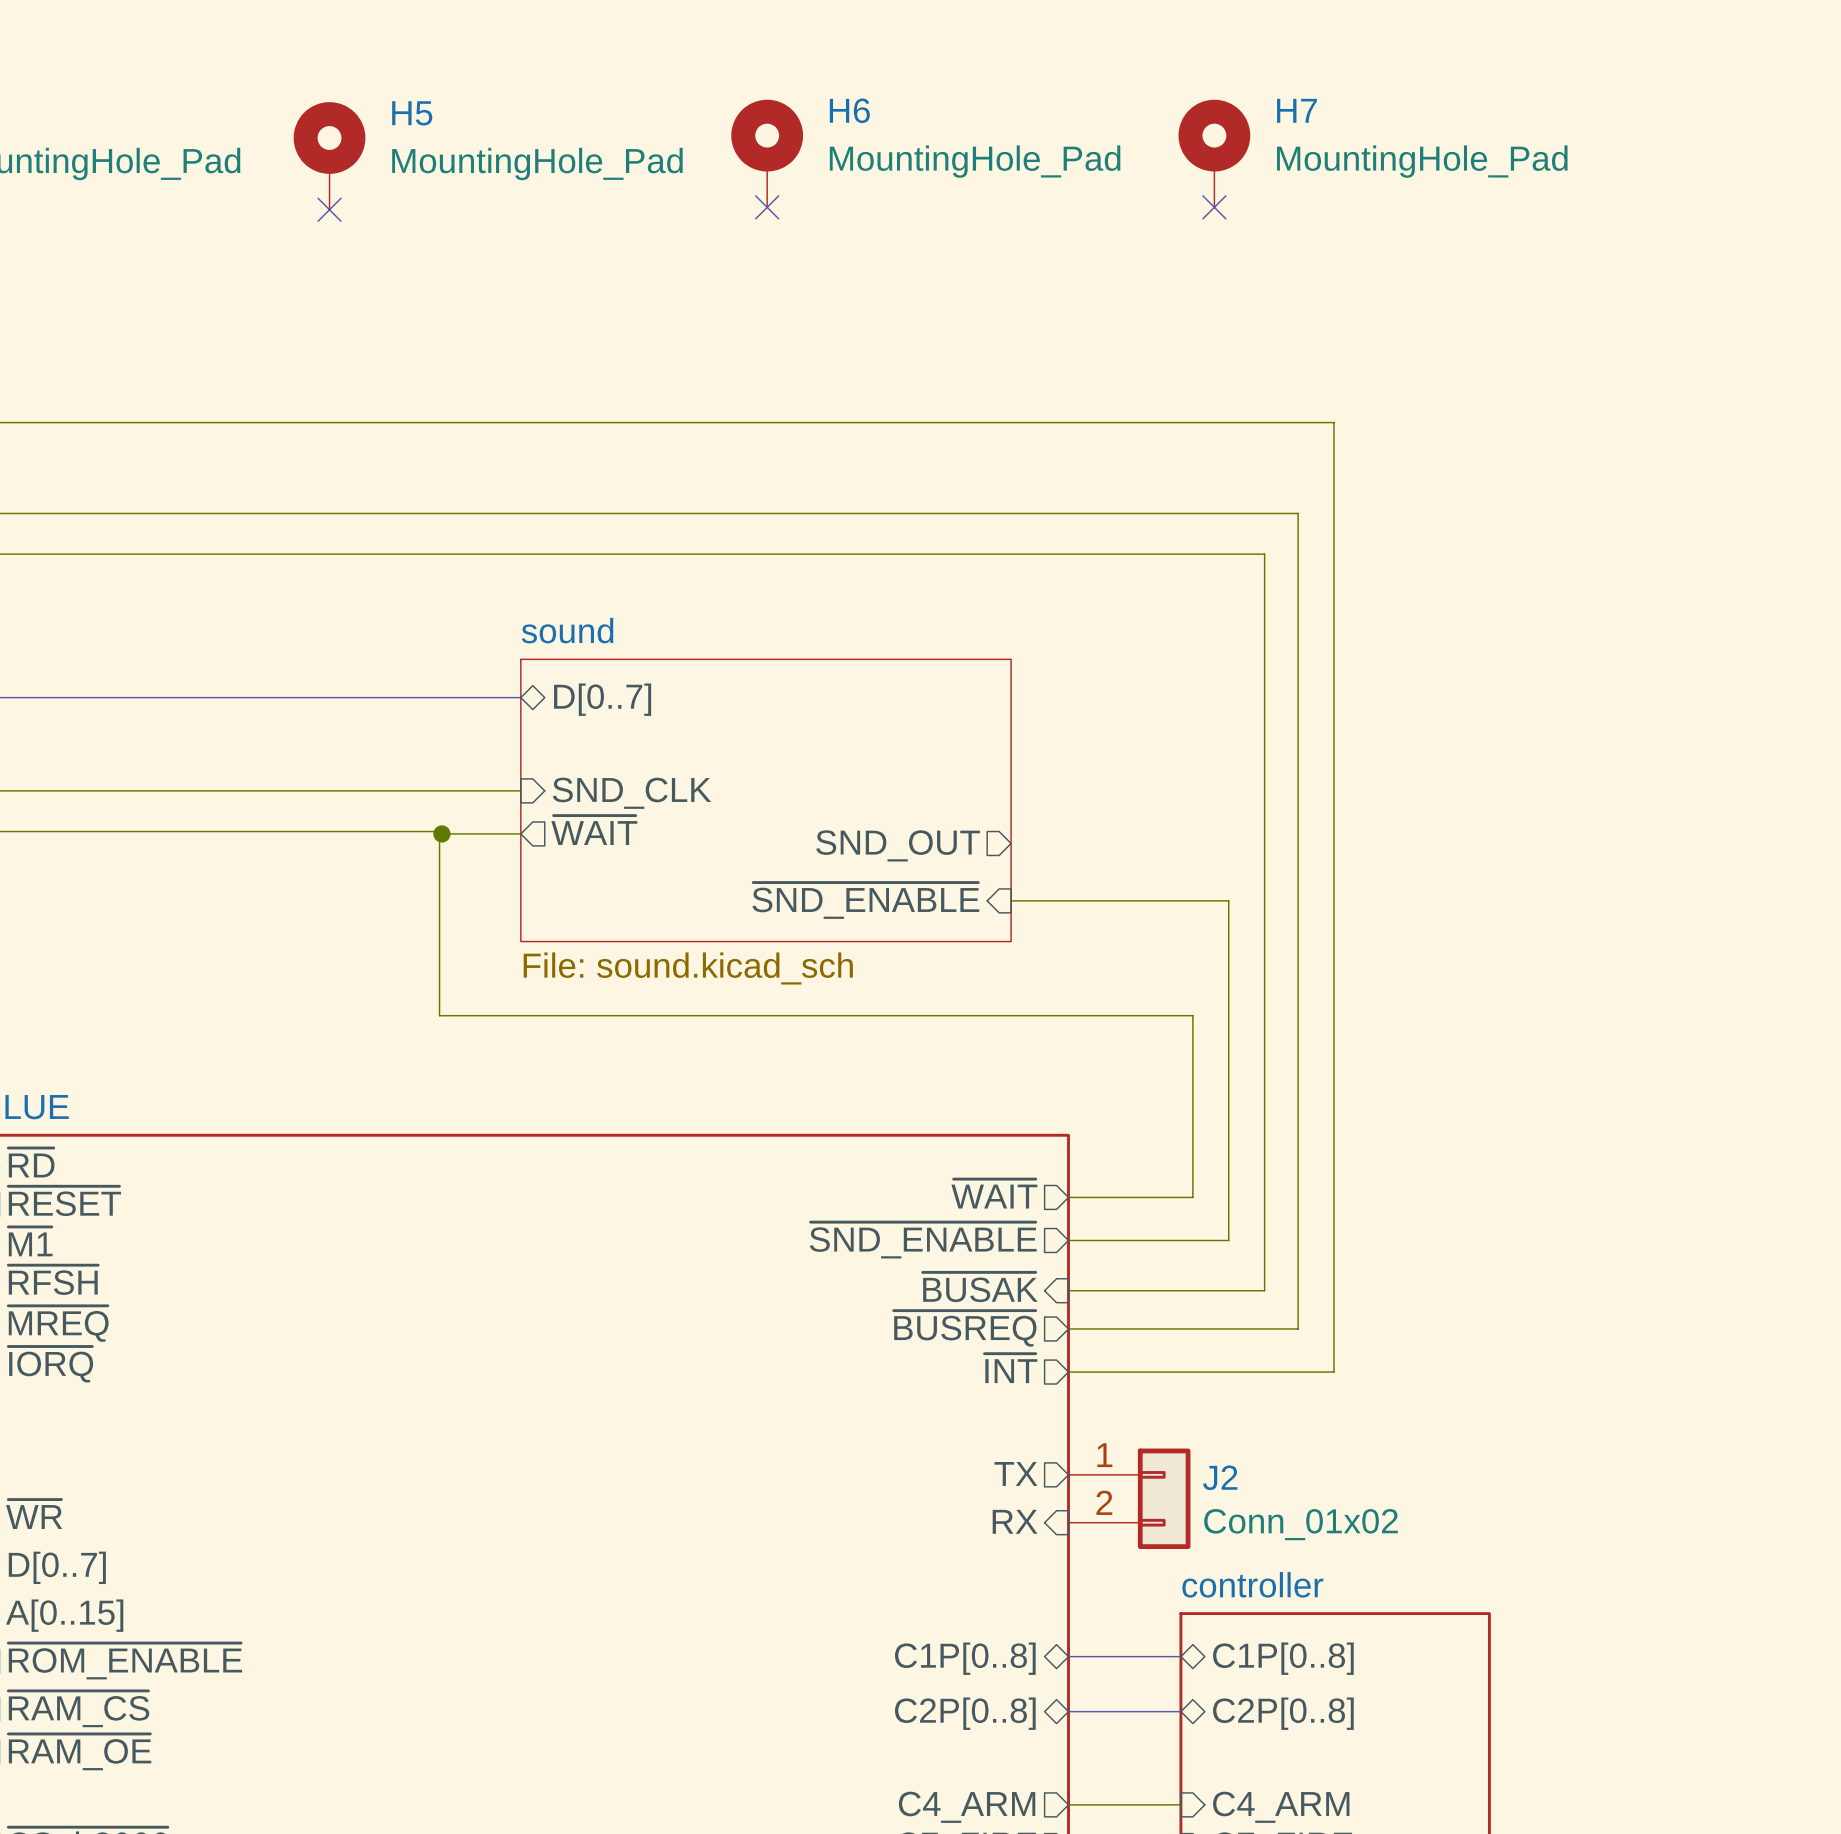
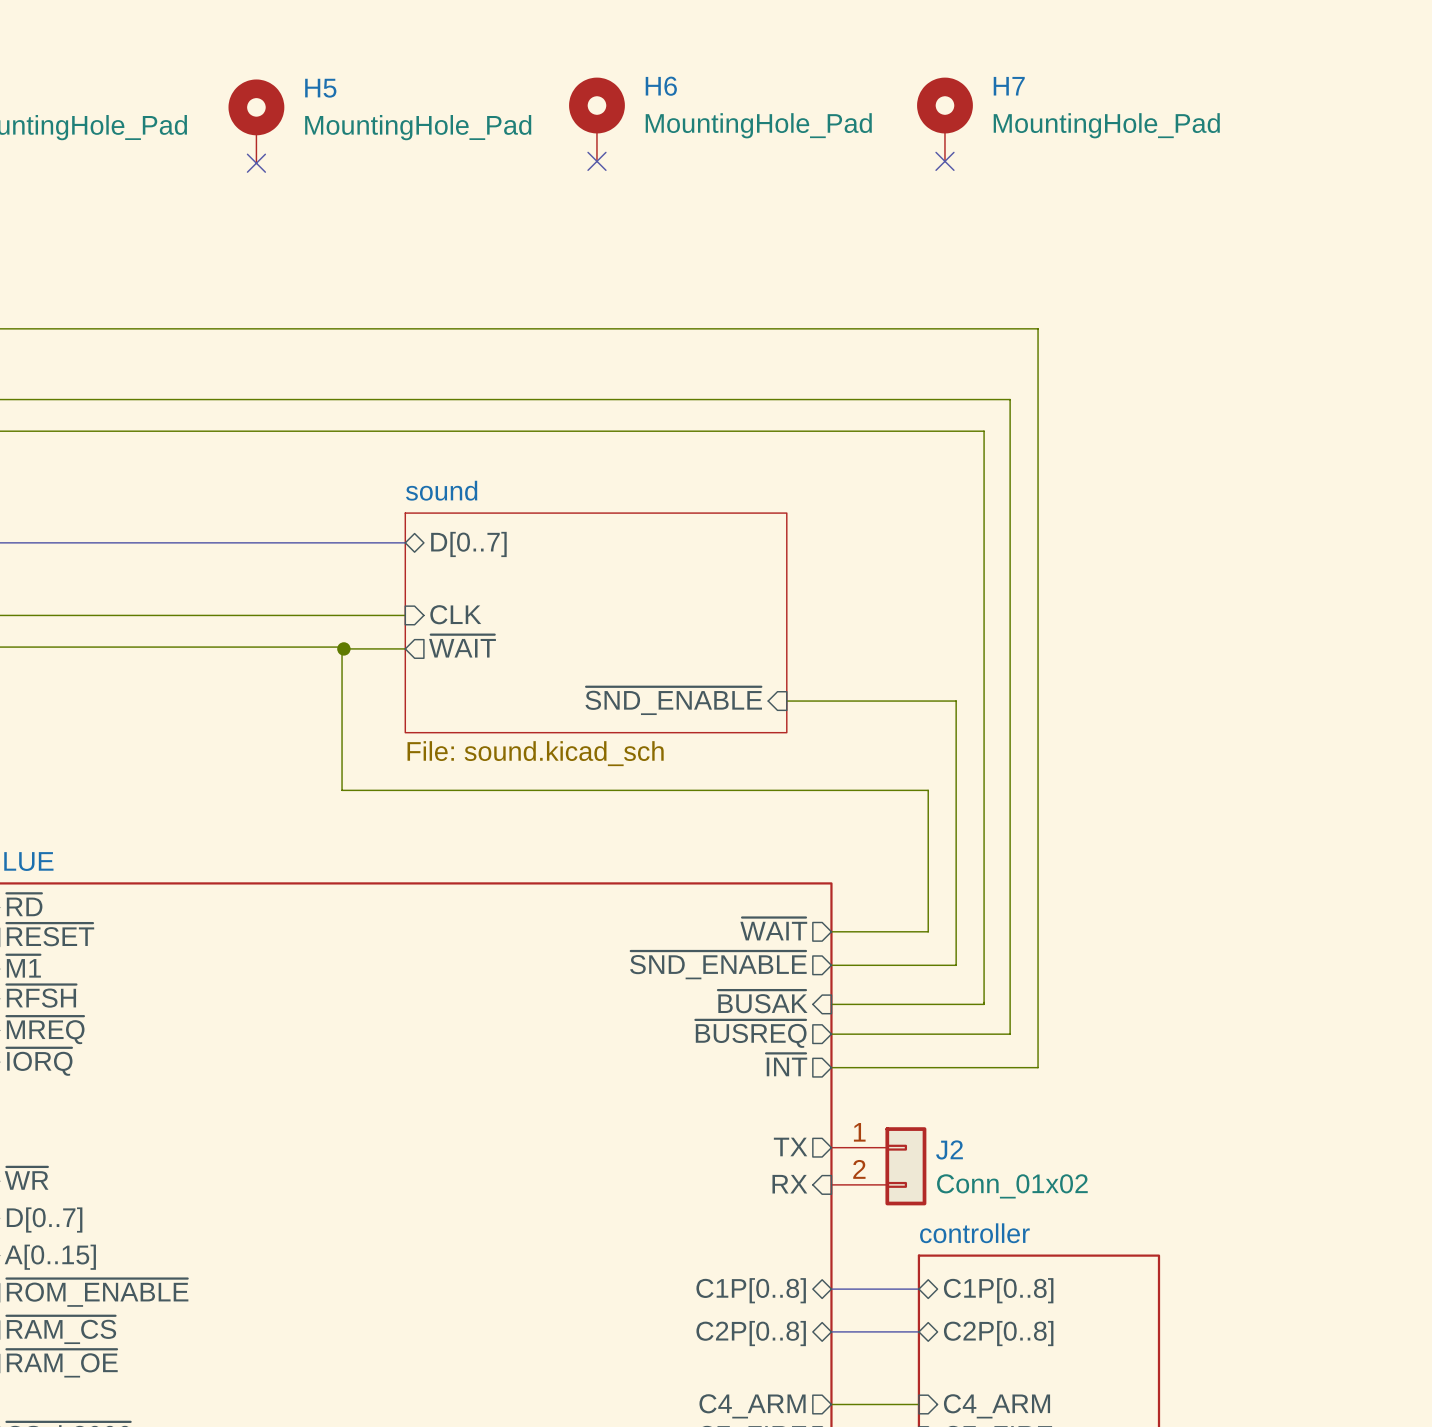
sheet pin: SND_CLK (631, 793) -> CLK (455, 614)
sheet pin: SND_OUT (898, 845) -> none

